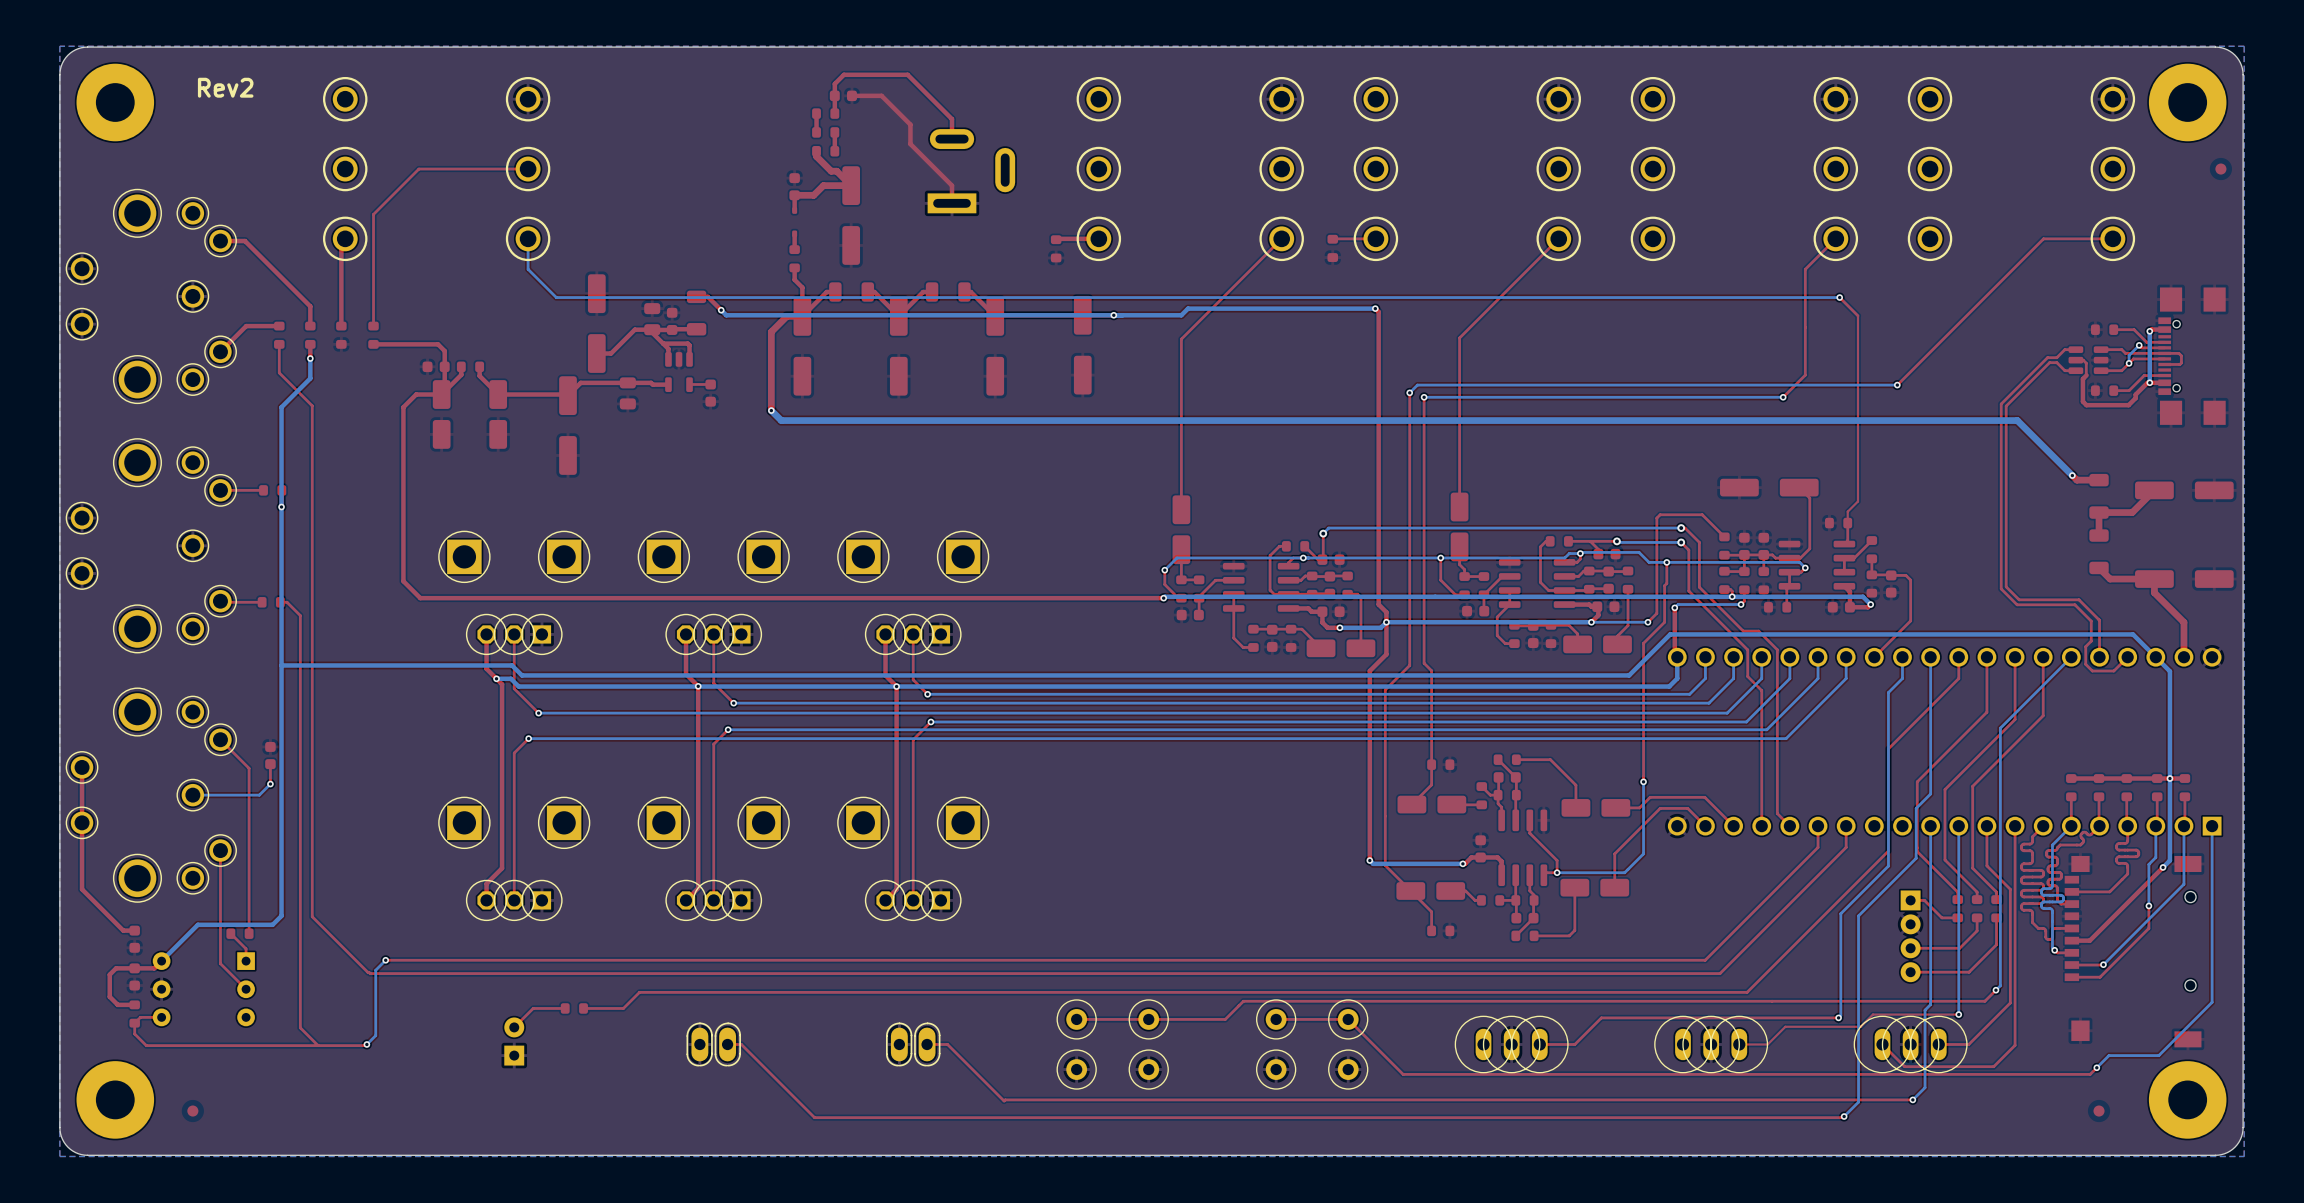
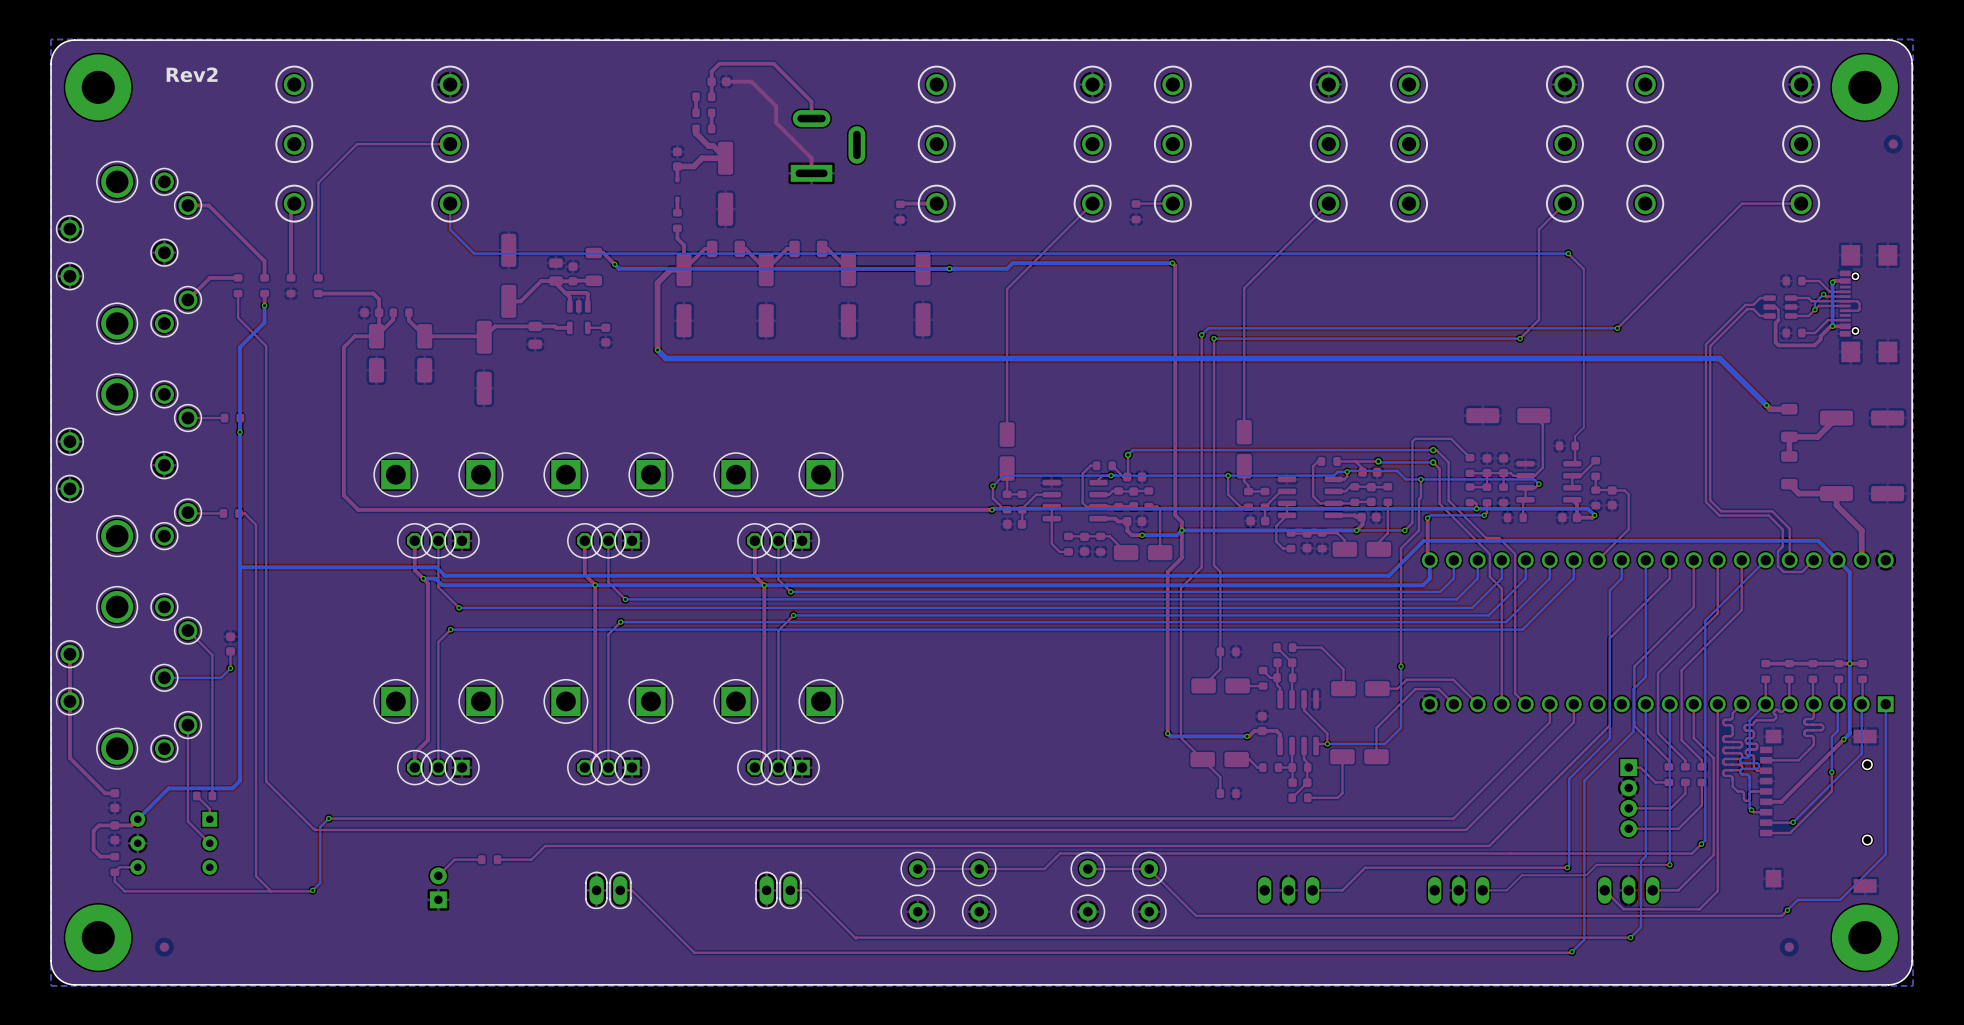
part footprint: [1454, 1015, 1569, 1074] -> [1257, 876, 1320, 904]
part footprint: [1654, 1015, 1769, 1074] -> [1427, 876, 1490, 904]
part footprint: [1853, 1015, 1968, 1074] -> [1598, 876, 1660, 904]

